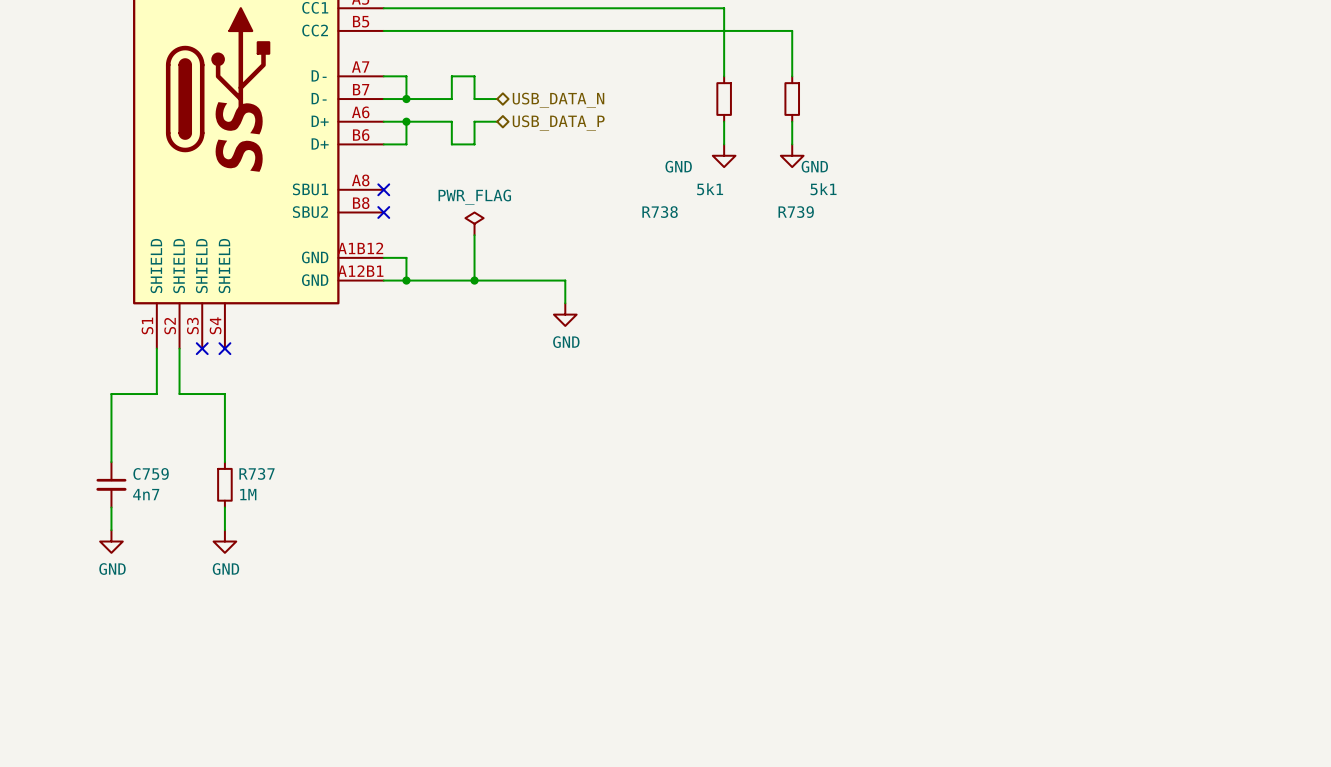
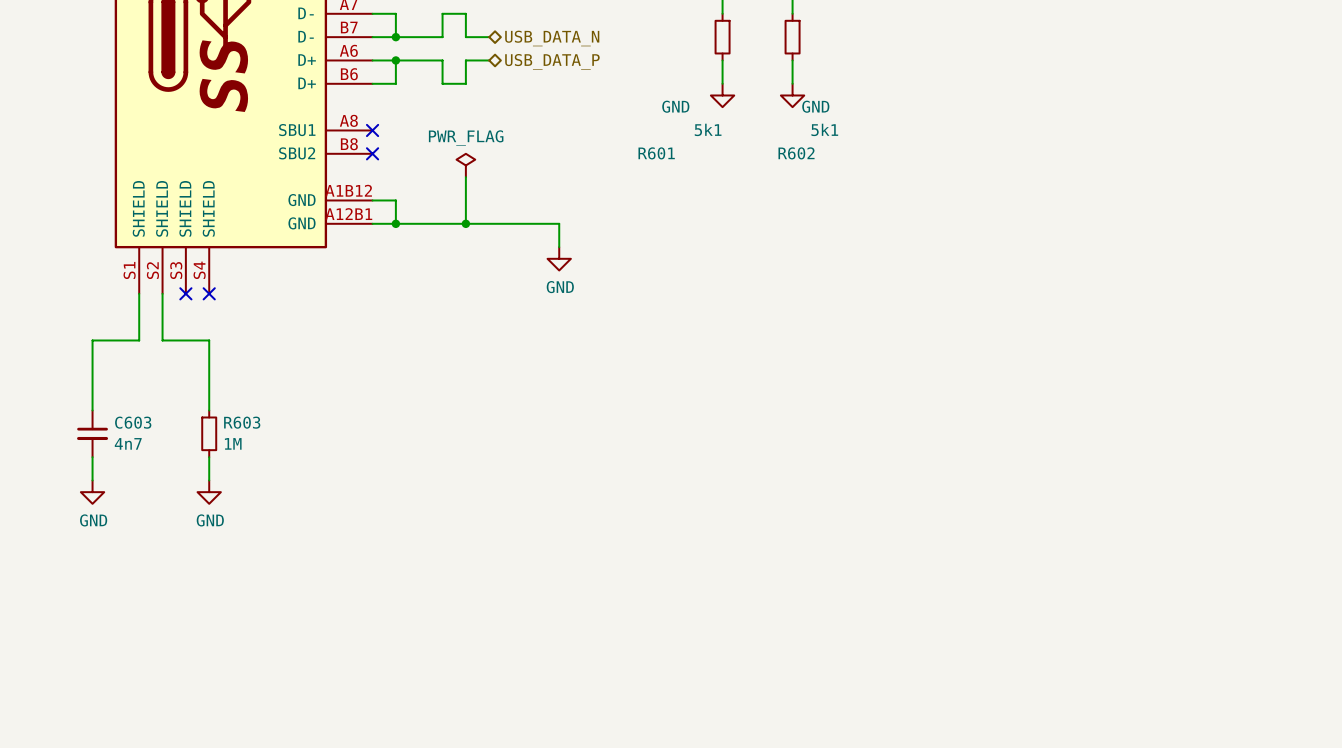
R738 name: R738 (660, 212) -> R601 (656, 153)
R739 name: R739 (796, 212) -> R602 (796, 153)
C759 name: C759 (151, 473) -> C603 (133, 422)
R737 name: R737 (257, 473) -> R603 (242, 422)

